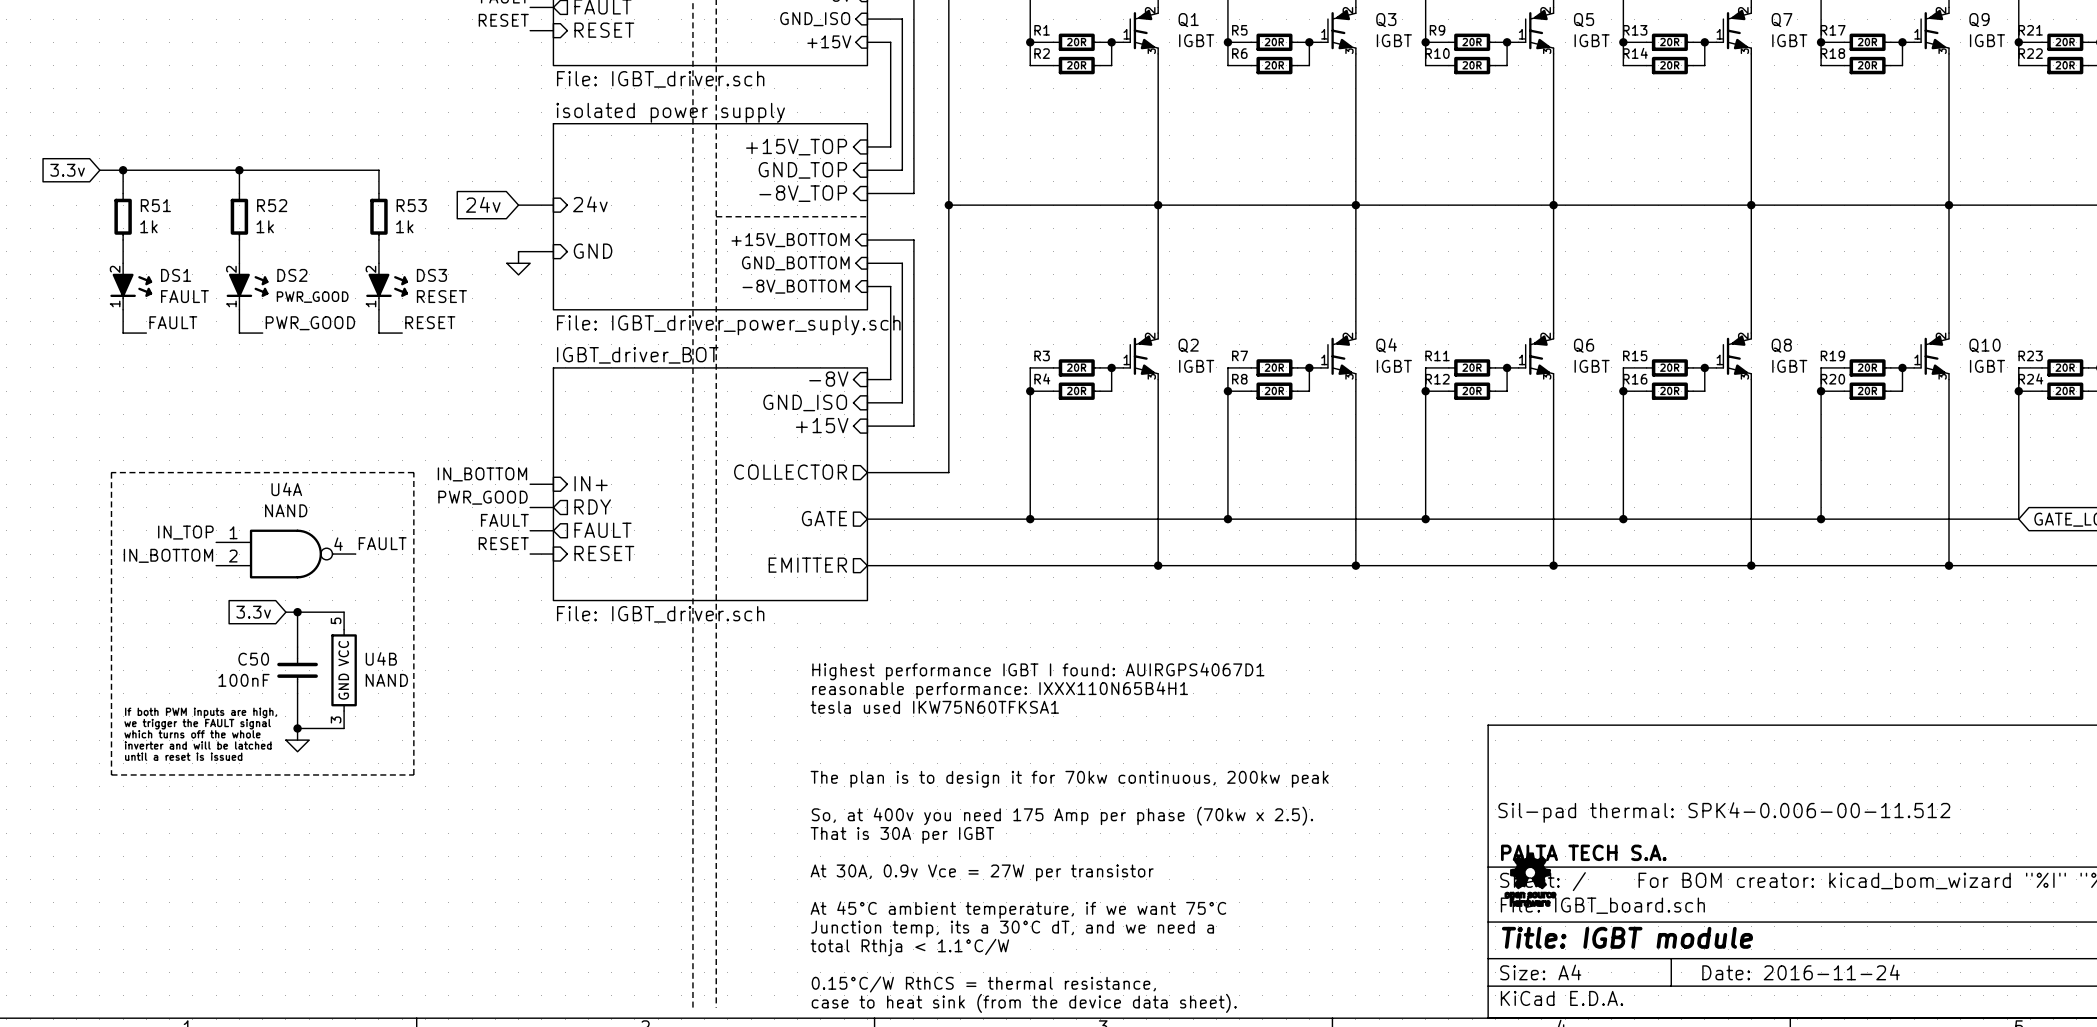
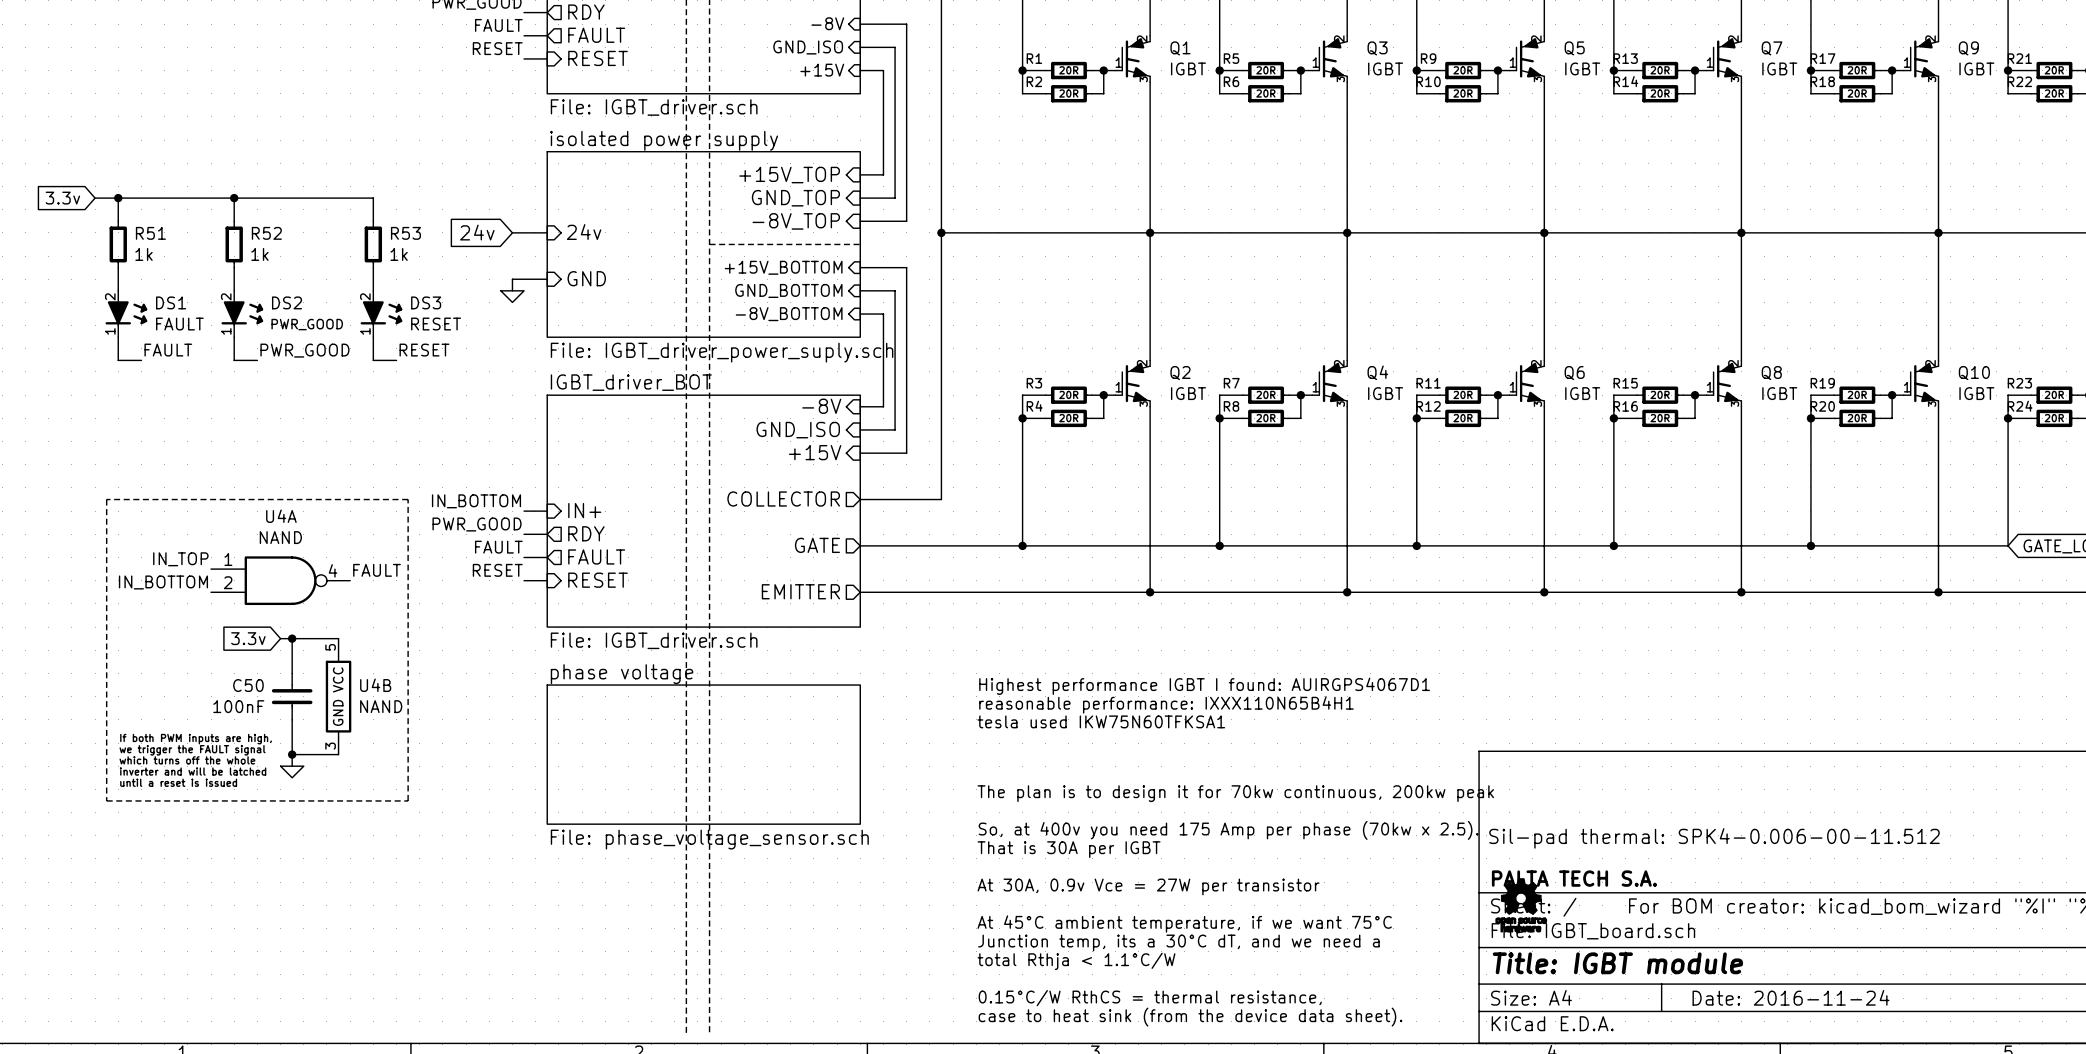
text position: Highest performance IGBT I found: AUIRGPS4067D1 (1038, 671) -> Highest performance IGBT I found: AUIRGPS4067D1 (1204, 686)
text position: reasonable performance: IXXX110N65B4H1 (1000, 690) -> reasonable performance: IXXX110N65B4H1 (1166, 704)
text position: tesla used IKW75N60TFKSA1 (934, 707) -> tesla used IKW75N60TFKSA1 (1101, 721)
sheet phase voltage: none -> File: phase_voltage_sensor.sch (703, 754)
text position: The plan is to design it for 70kw continuous, 200kw peak (1069, 779) -> The plan is to design it for 70kw continuous, 200kw peak (1235, 793)
text position: So, at 400v you need 175 Amp per phase (70kw x 2.5). (1062, 816) -> So, at 400v you need 175 Amp per phase (70kw x 2.5). (1228, 830)
text position: That is 30A per IGBT (902, 835) -> That is 30A per IGBT (1069, 849)
text position: At 30A, 0.9v Vce = 27W per transistor (982, 872) -> At 30A, 0.9v Vce = 27W per transistor (1148, 886)
text position: At 45°C ambient temperature, if we want 75°C (1018, 910) -> At 45°C ambient temperature, if we want 75°C (1184, 924)
text position: Junction temp, its a 30°C dT, and we need a (1012, 929) -> Junction temp, its a 30°C dT, and we need a (1178, 942)
text position: total Rthja < 1.1°C/W (909, 947) -> total Rthja < 1.1°C/W (1076, 961)
text position: 0.15°C/W RthCS = thermal resistance, (983, 984) -> 0.15°C/W RthCS = thermal resistance, (1150, 998)
text position: case to heat sink (from the device data sheet). (1024, 1003) -> case to heat sink (from the device data sheet). (1190, 1017)

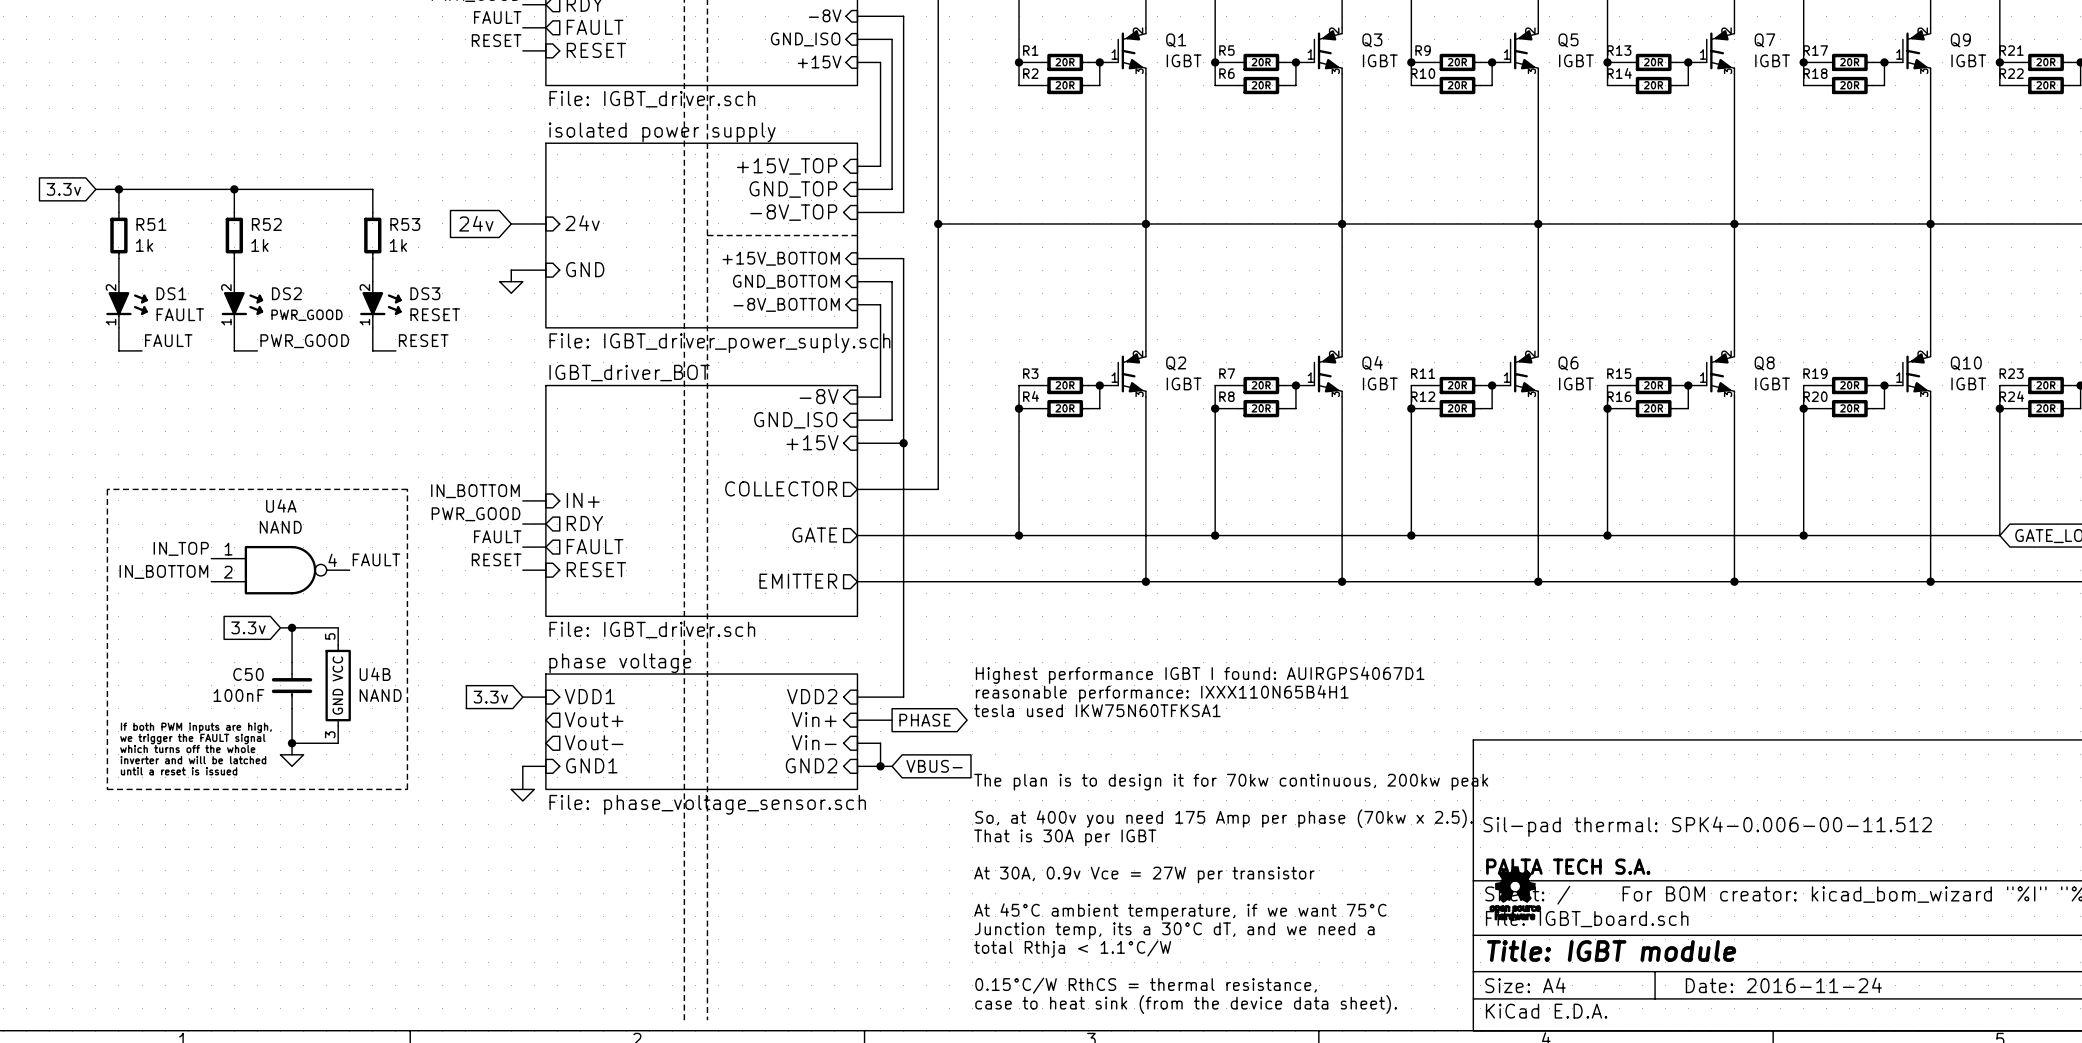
wire: none -> (903, 443) (903, 697) (857, 697)
junction: none -> (903, 443)
sheet pin: none -> VDD1 (589, 696)
sheet pin: none -> VDD2 (812, 696)
global label: none -> 3.3v (490, 697)
wire: none -> (522, 697) (545, 697)
sheet pin: none -> Vout+ (594, 719)
sheet pin: none -> Vin+ (814, 719)
wire: none -> (857, 720) (892, 720)
global label: none -> PHASE (925, 720)
sheet phase voltage: none -> File: phase_voltage_sensor.sch (701, 731)
sheet pin: none -> Vout- (594, 742)
sheet phase voltage: File: phase_voltage_sensor.sch (703, 754) -> none
sheet pin: none -> Vin- (814, 742)
wire: none -> (857, 743) (880, 743) (880, 766)
wire: none -> (545, 766) (522, 766) (522, 789)
sheet pin: none -> GND1 (591, 765)
sheet pin: none -> GND2 (811, 765)
wire: none -> (857, 766) (892, 766)
junction: none -> (880, 766)
global label: none -> VBUS- (934, 766)
power symbol: none -> (522, 795)

